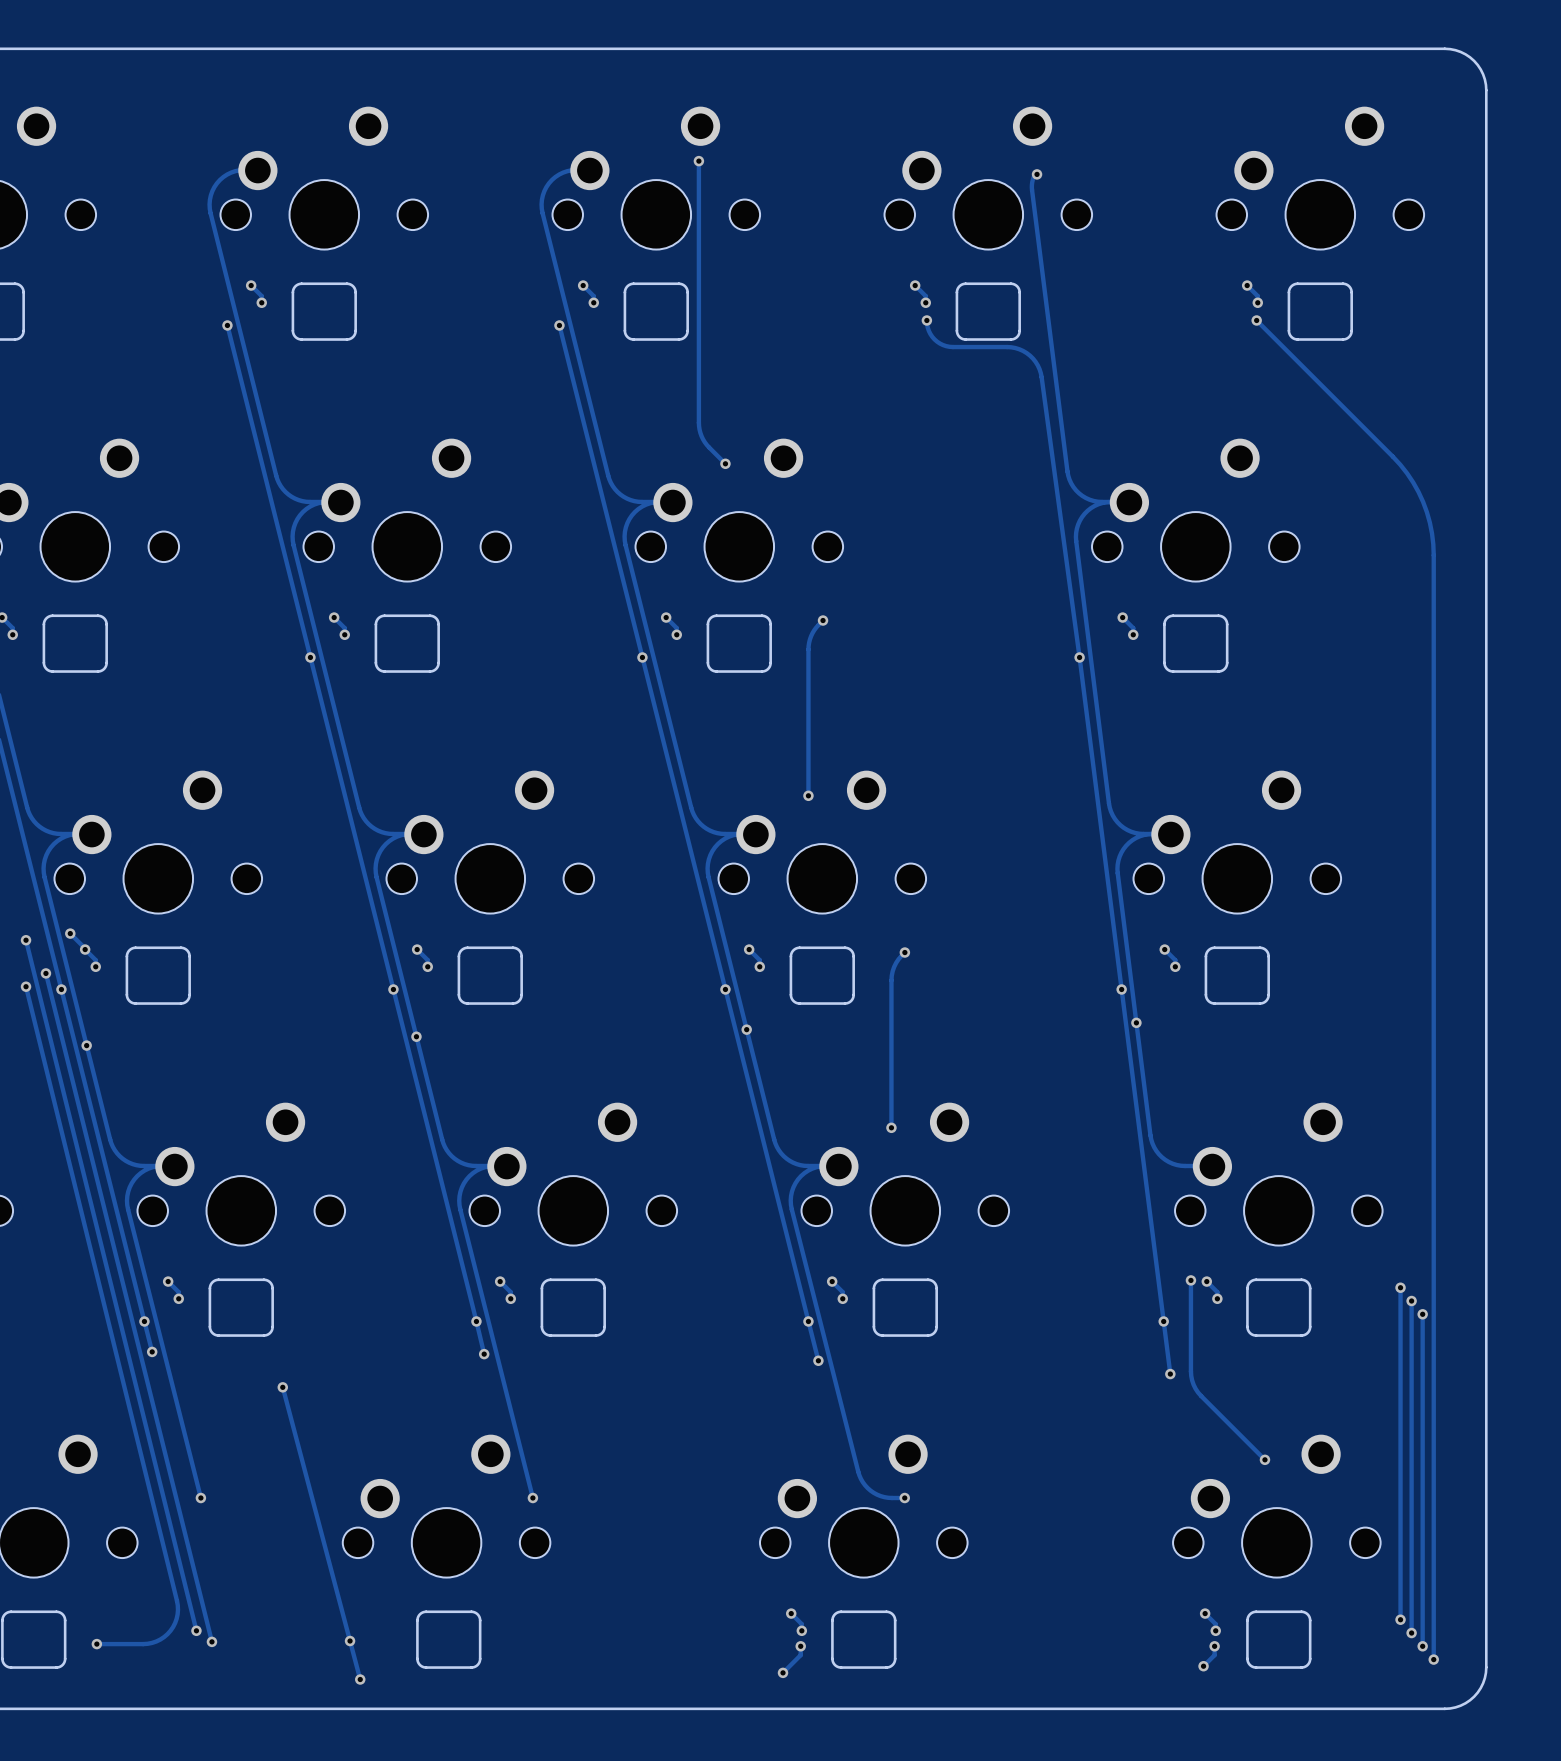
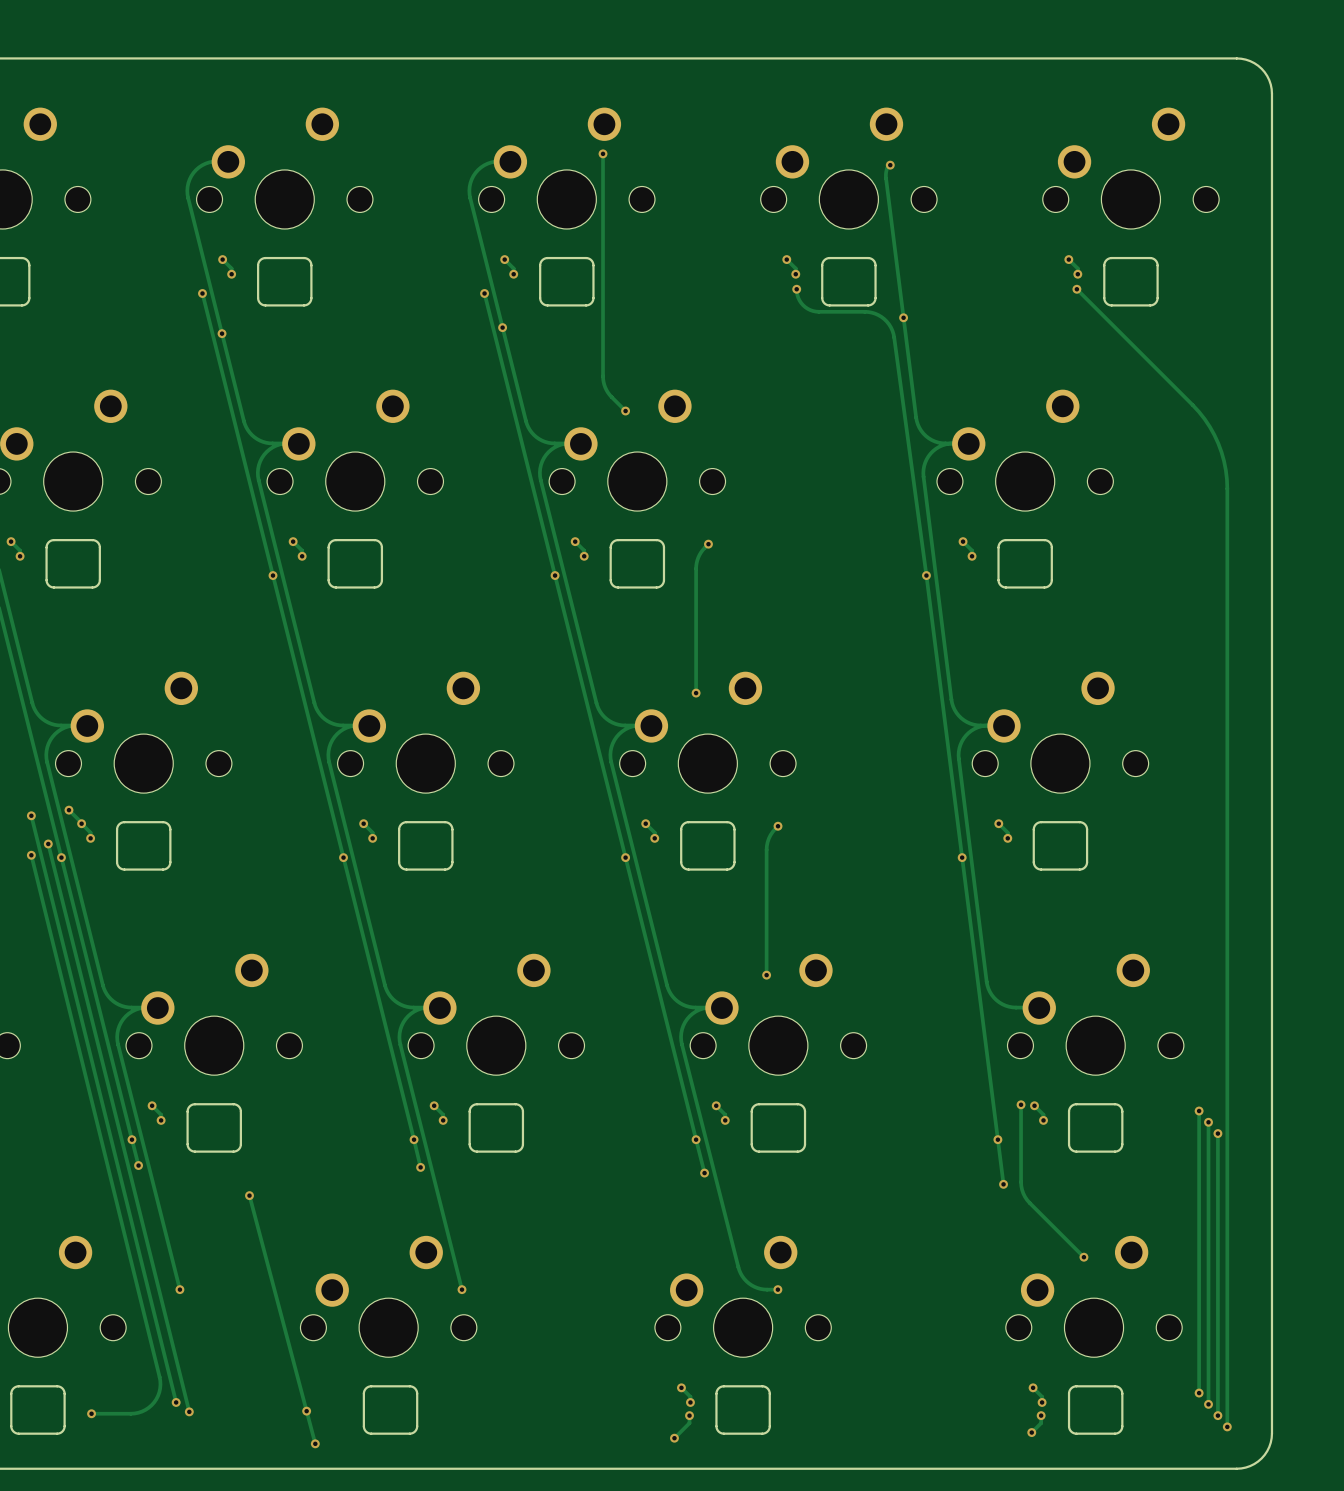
via: none -> (903, 317)
via: none -> (502, 327)
via: none -> (222, 333)
via: (1136, 1022) -> none
via: (746, 1029) -> none
via: (416, 1036) -> none
via: (86, 1045) -> none

